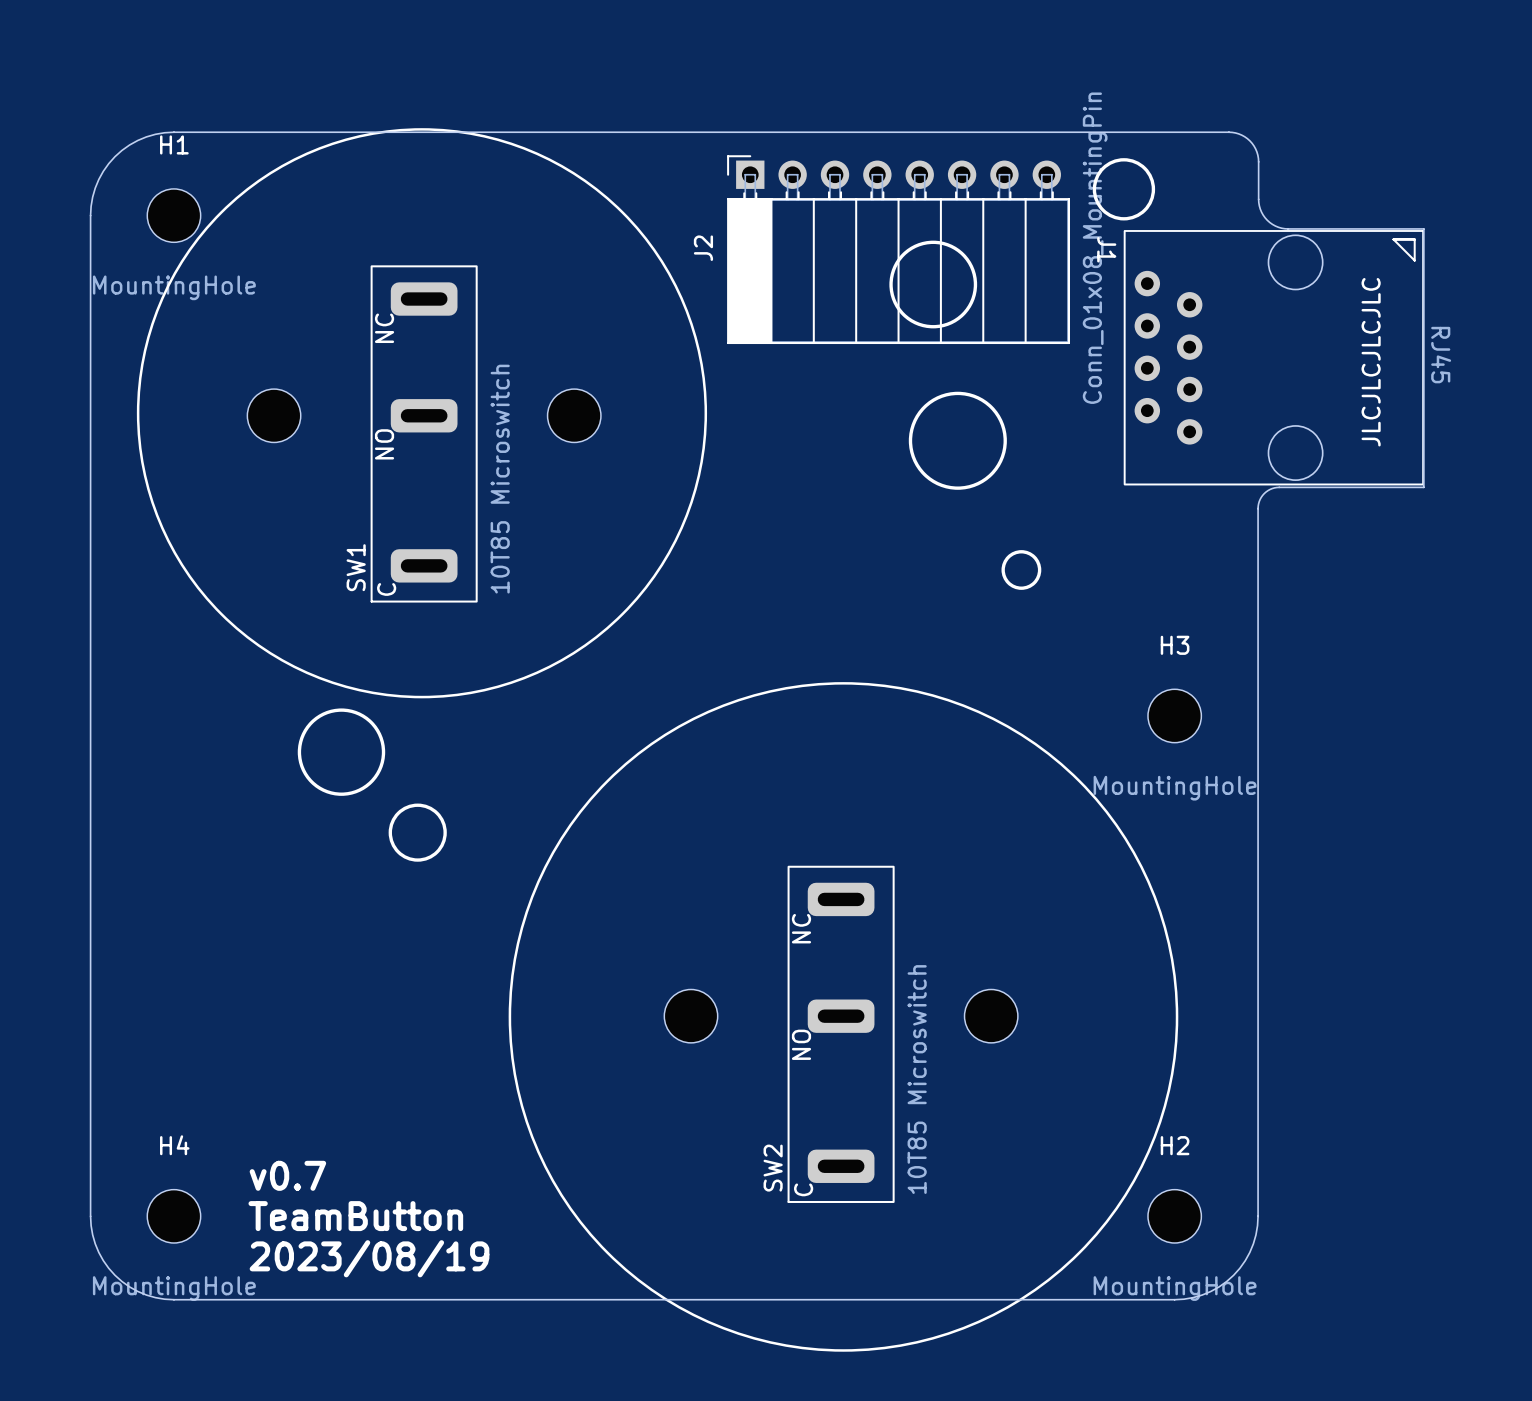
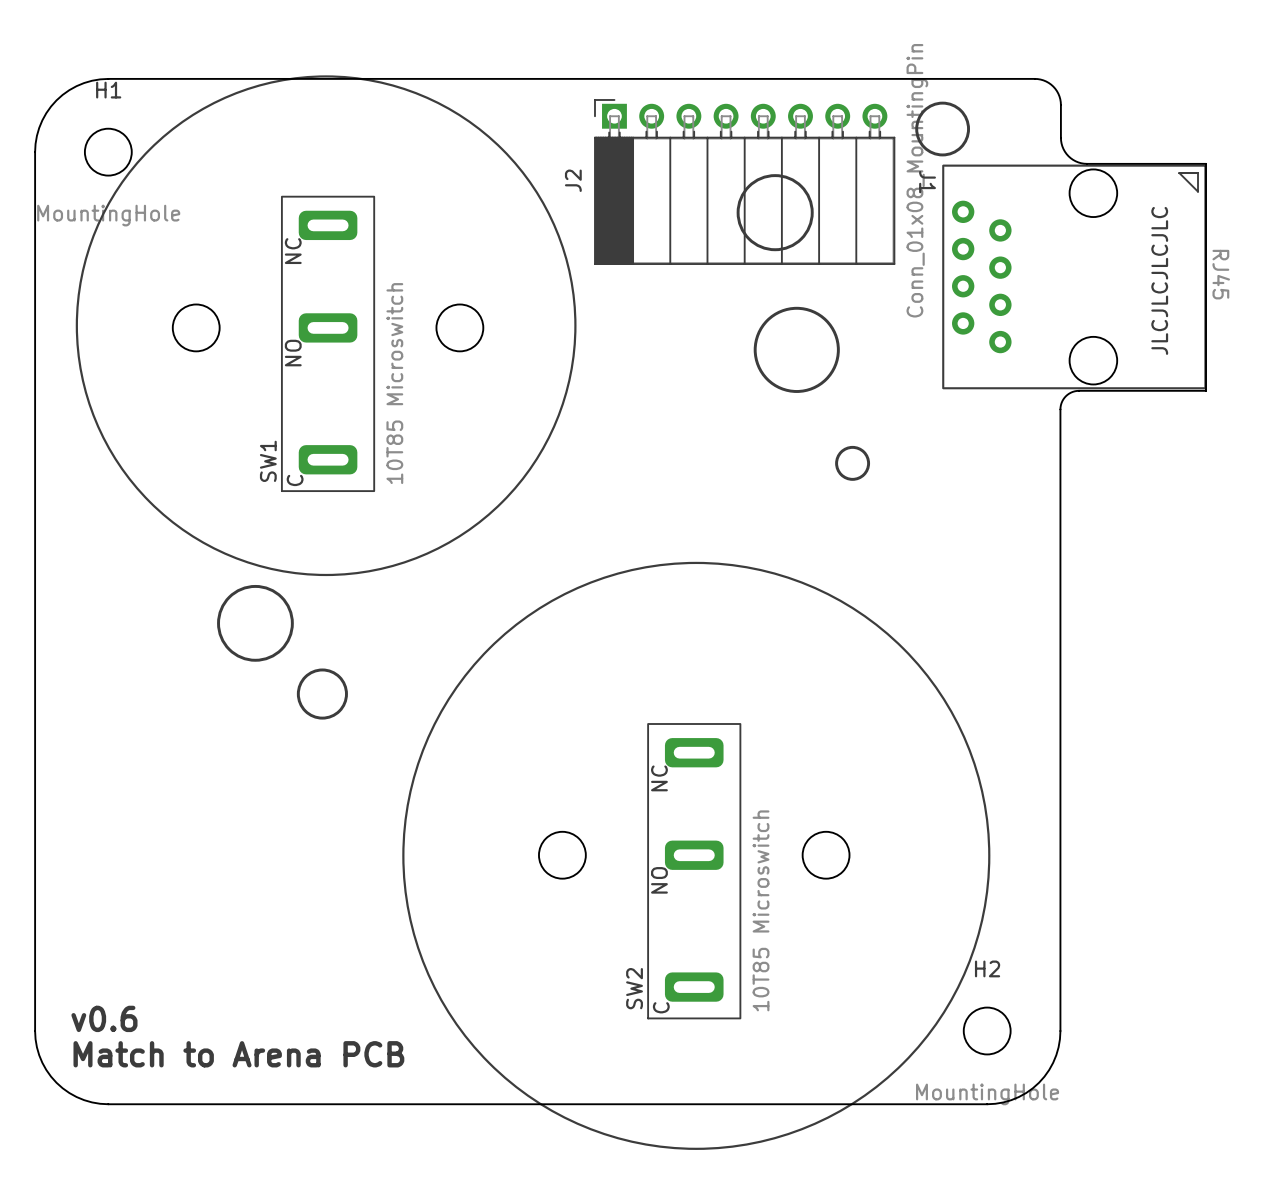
H3: MountingHole (1174, 715) -> none
text: v0.7 (287, 1175) -> none
text: none -> v0.6 (104, 1018)
H4: MountingHole (173, 1216) -> none
text: TeamButton (355, 1216) -> none
text: none -> Match to Arena PCB (238, 1054)
text: 2023/08/19 (369, 1258) -> none

